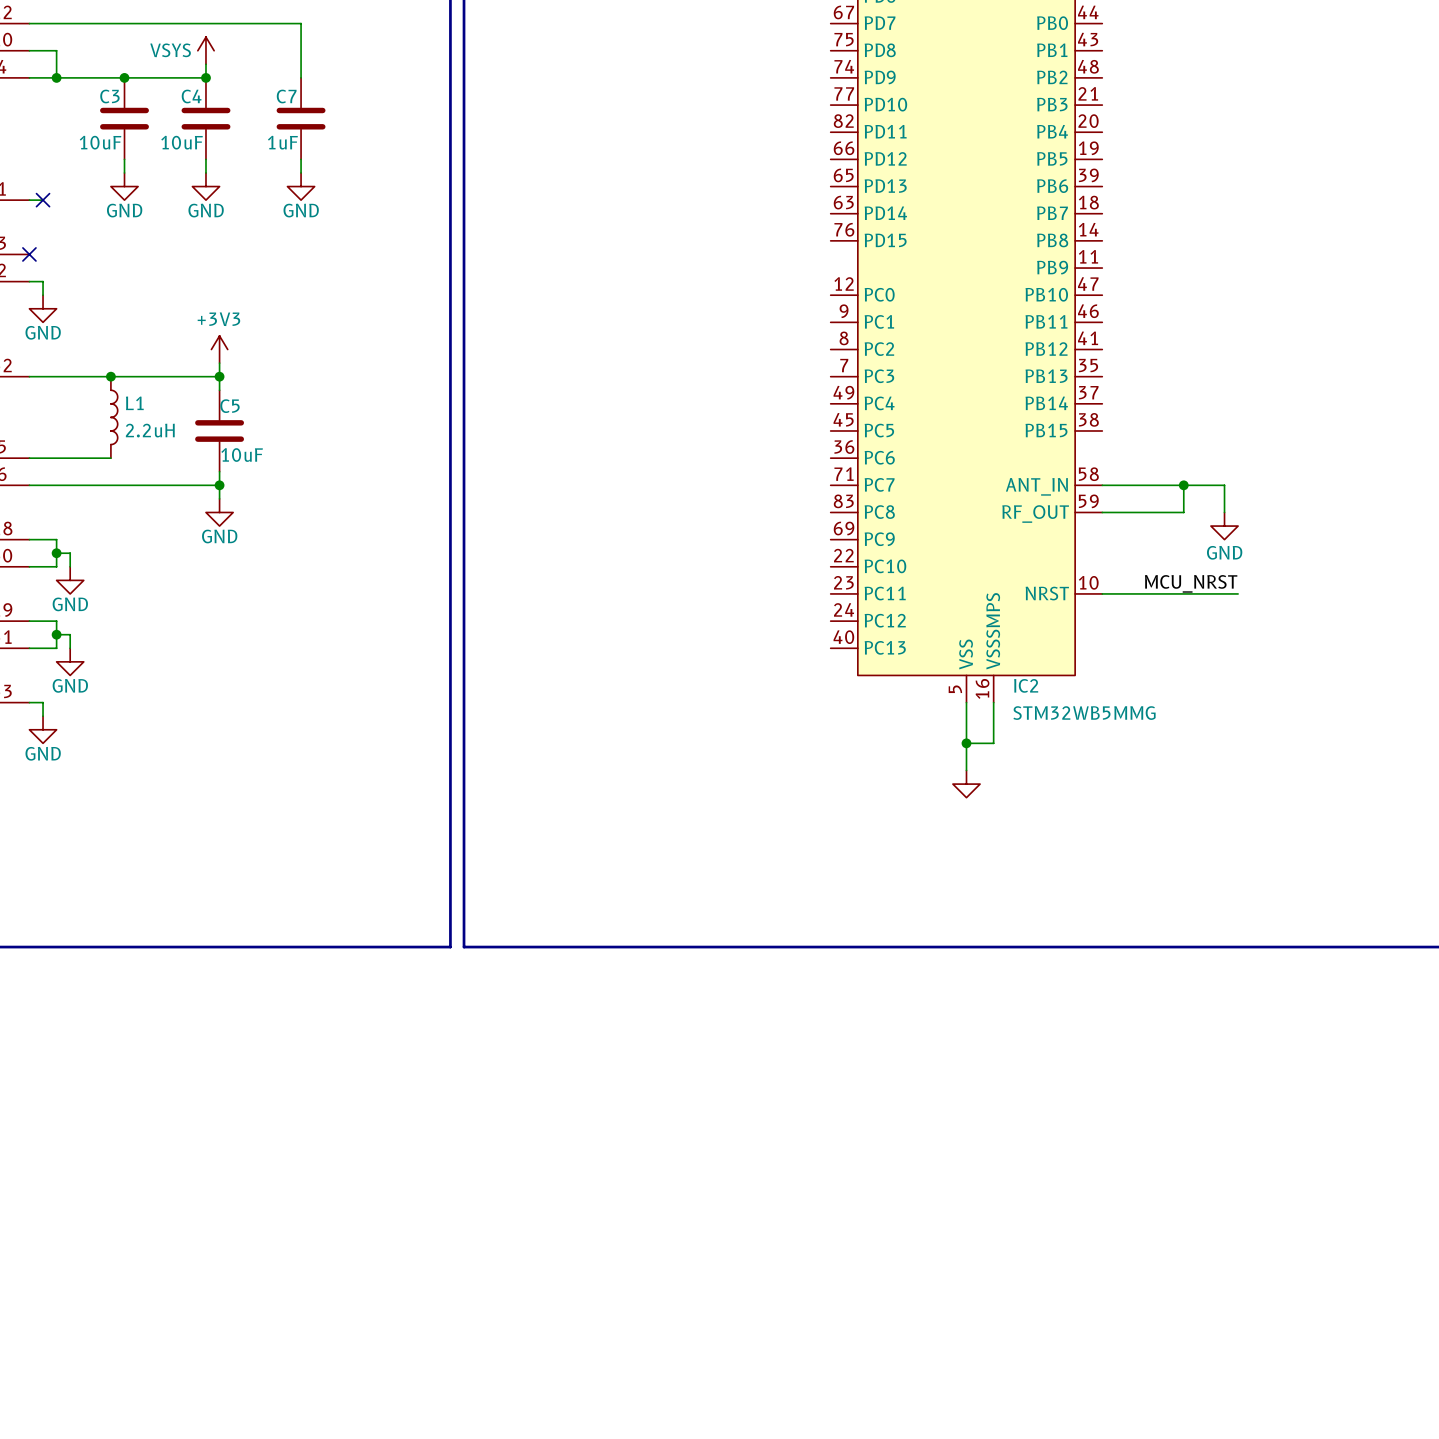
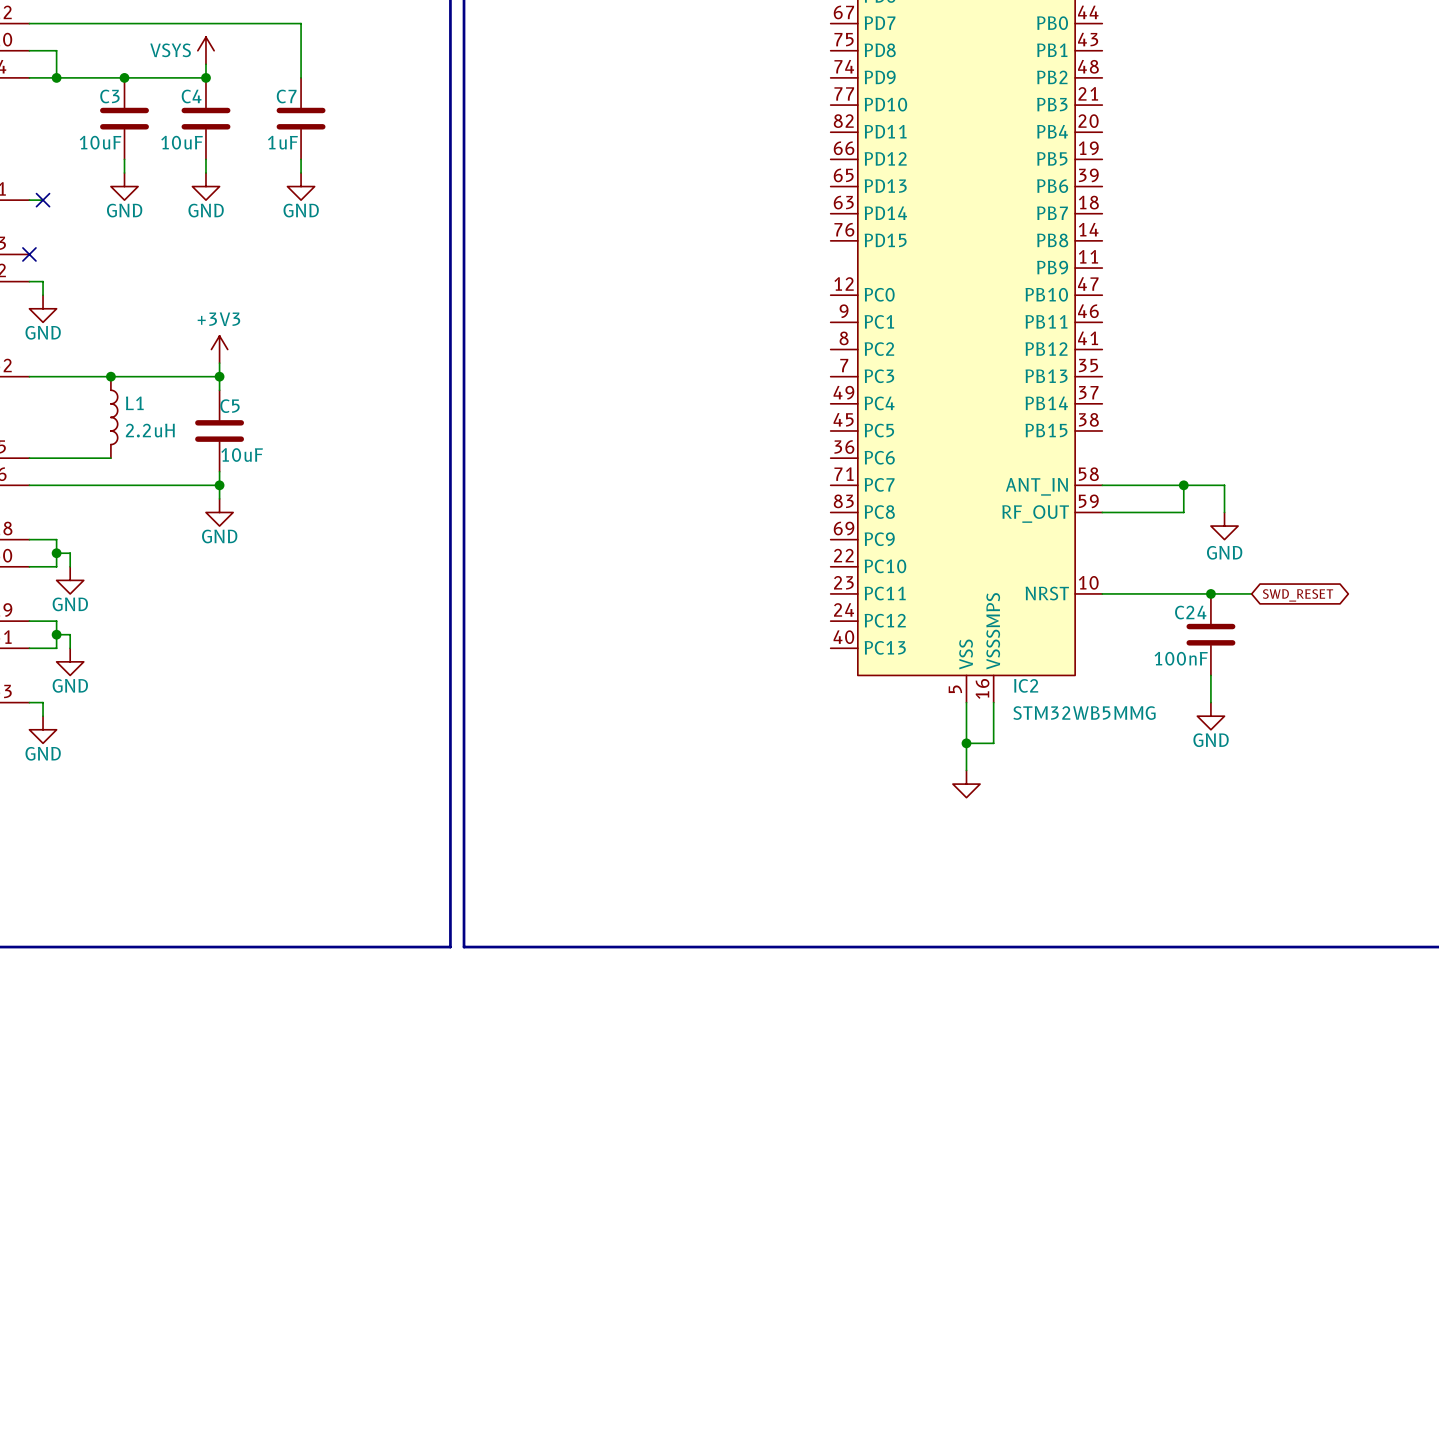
label: MCU_NRST (1191, 583) -> none
junction: none -> (1210, 593)
wire: none -> (1238, 593) (1251, 593)
global label: none -> SWD_RESET (1298, 595)
C24: none -> 100nF (1210, 634)
wire: none -> (1210, 675) (1210, 702)
power symbol: none -> GND (1210, 716)

